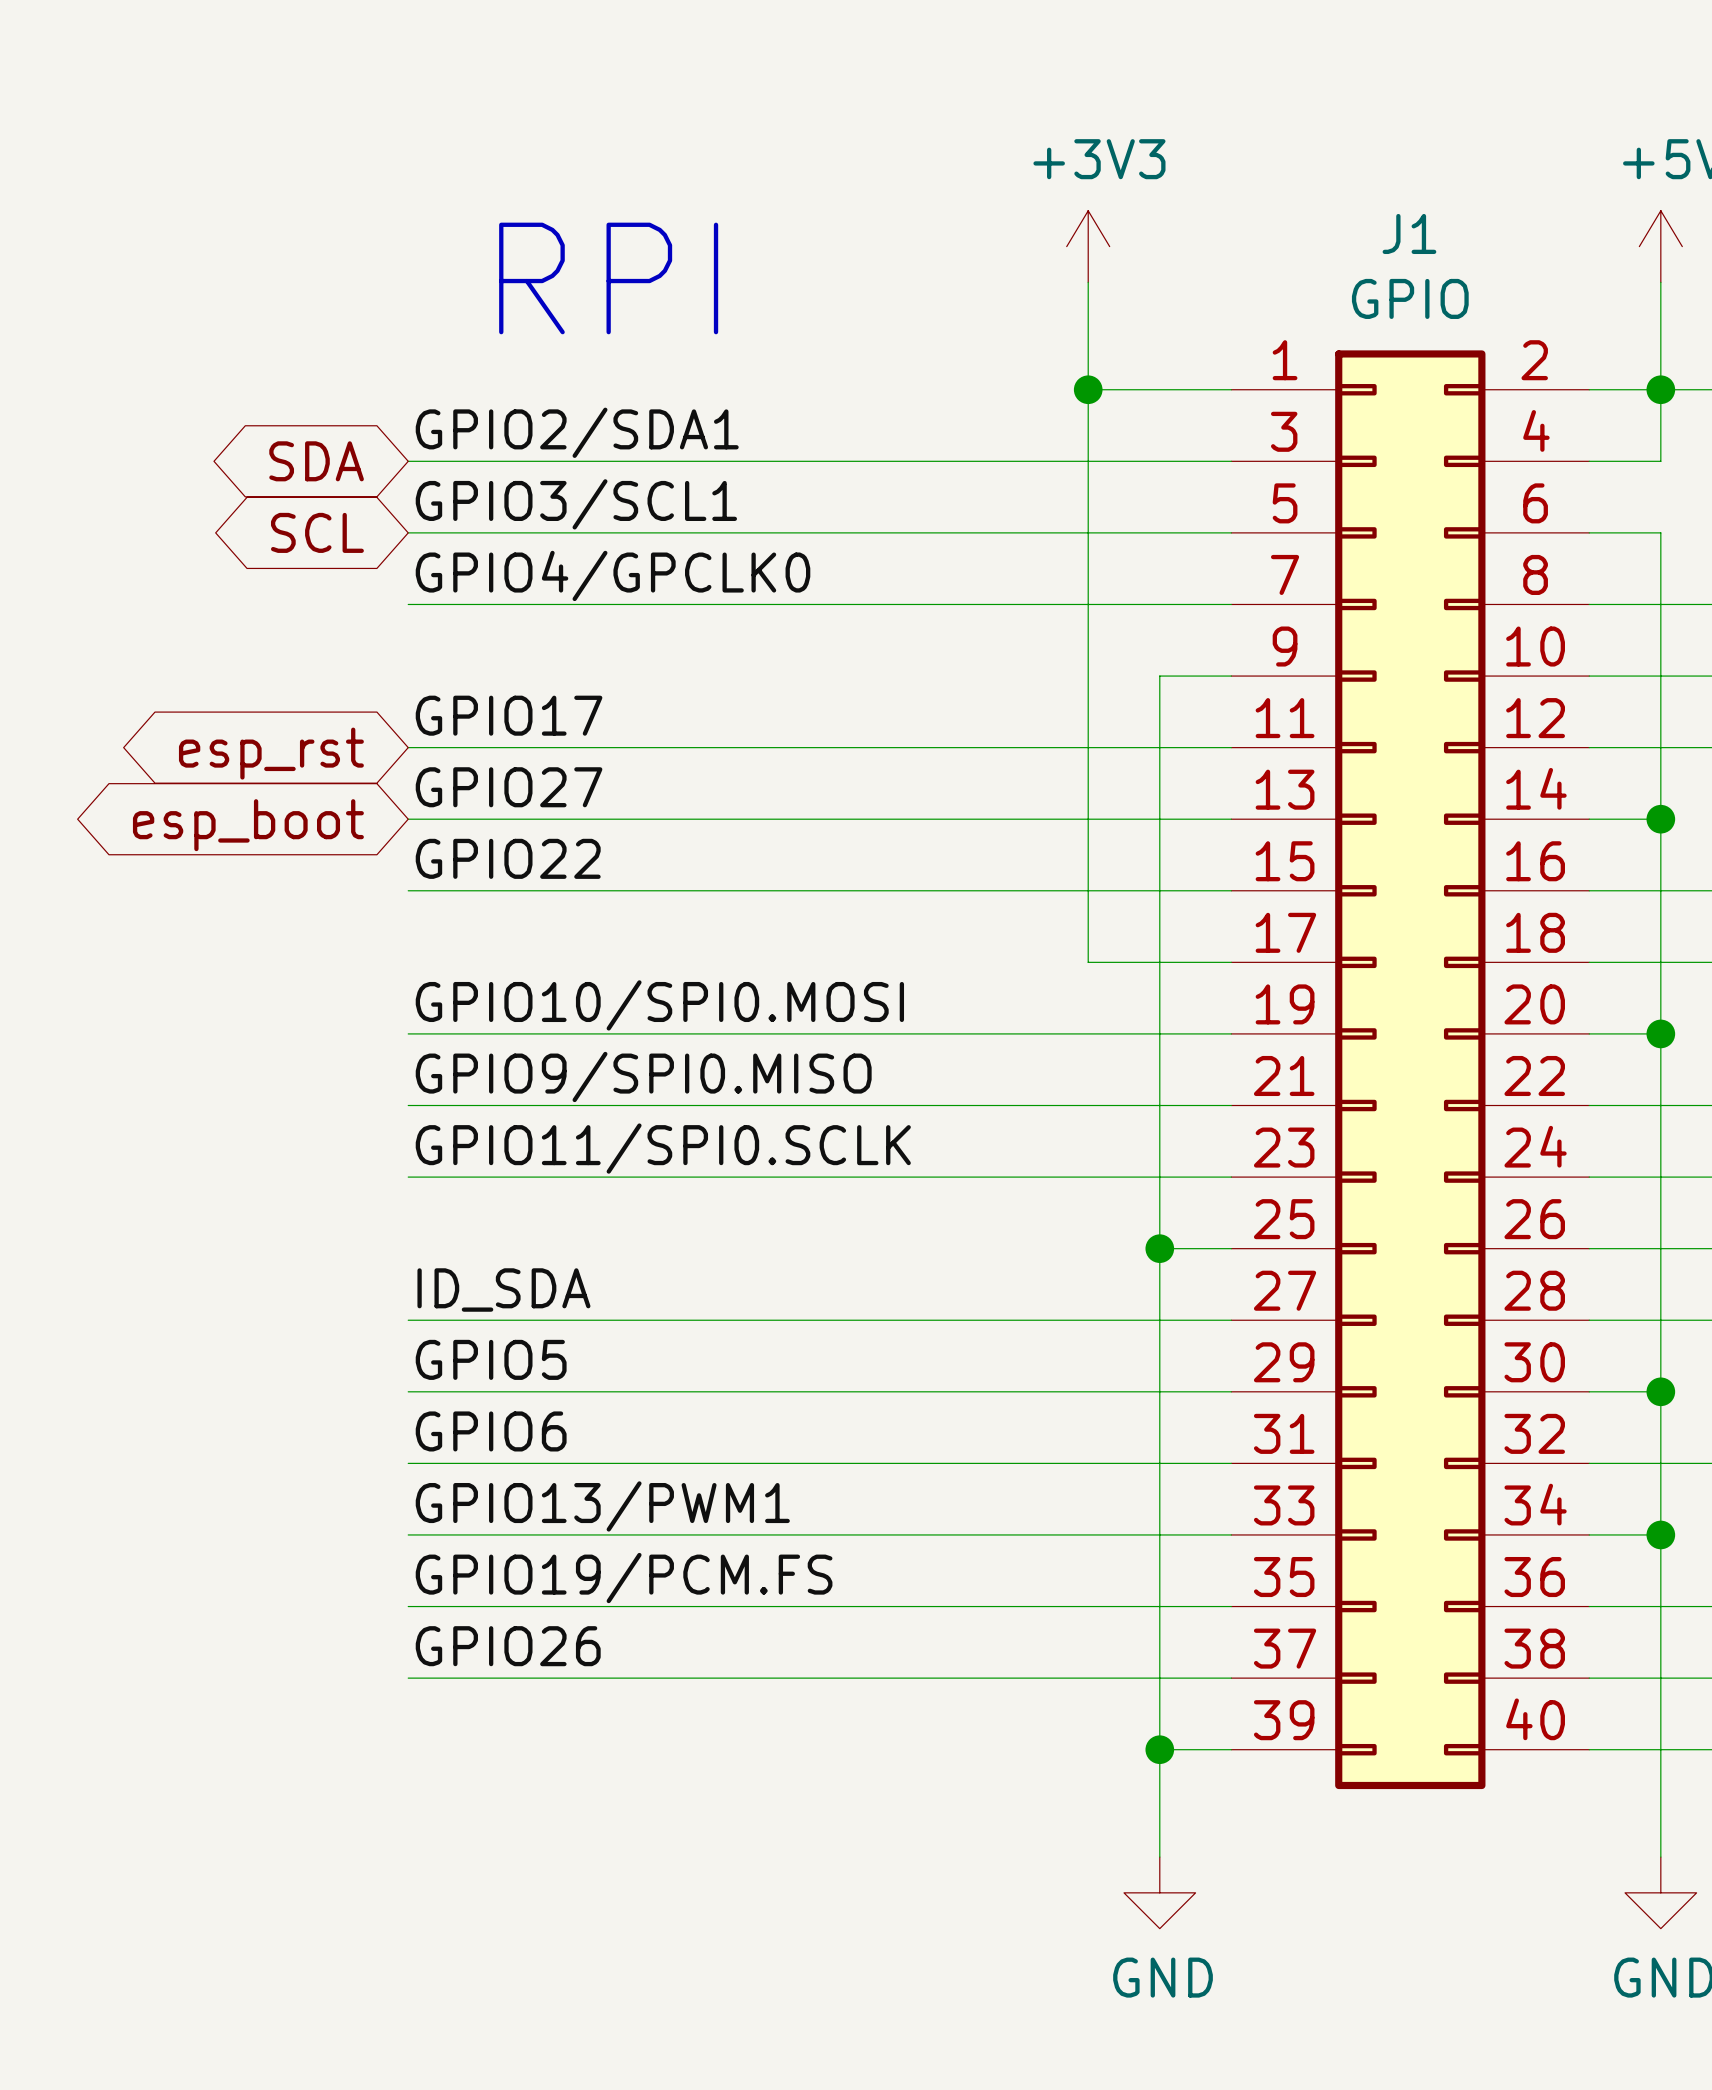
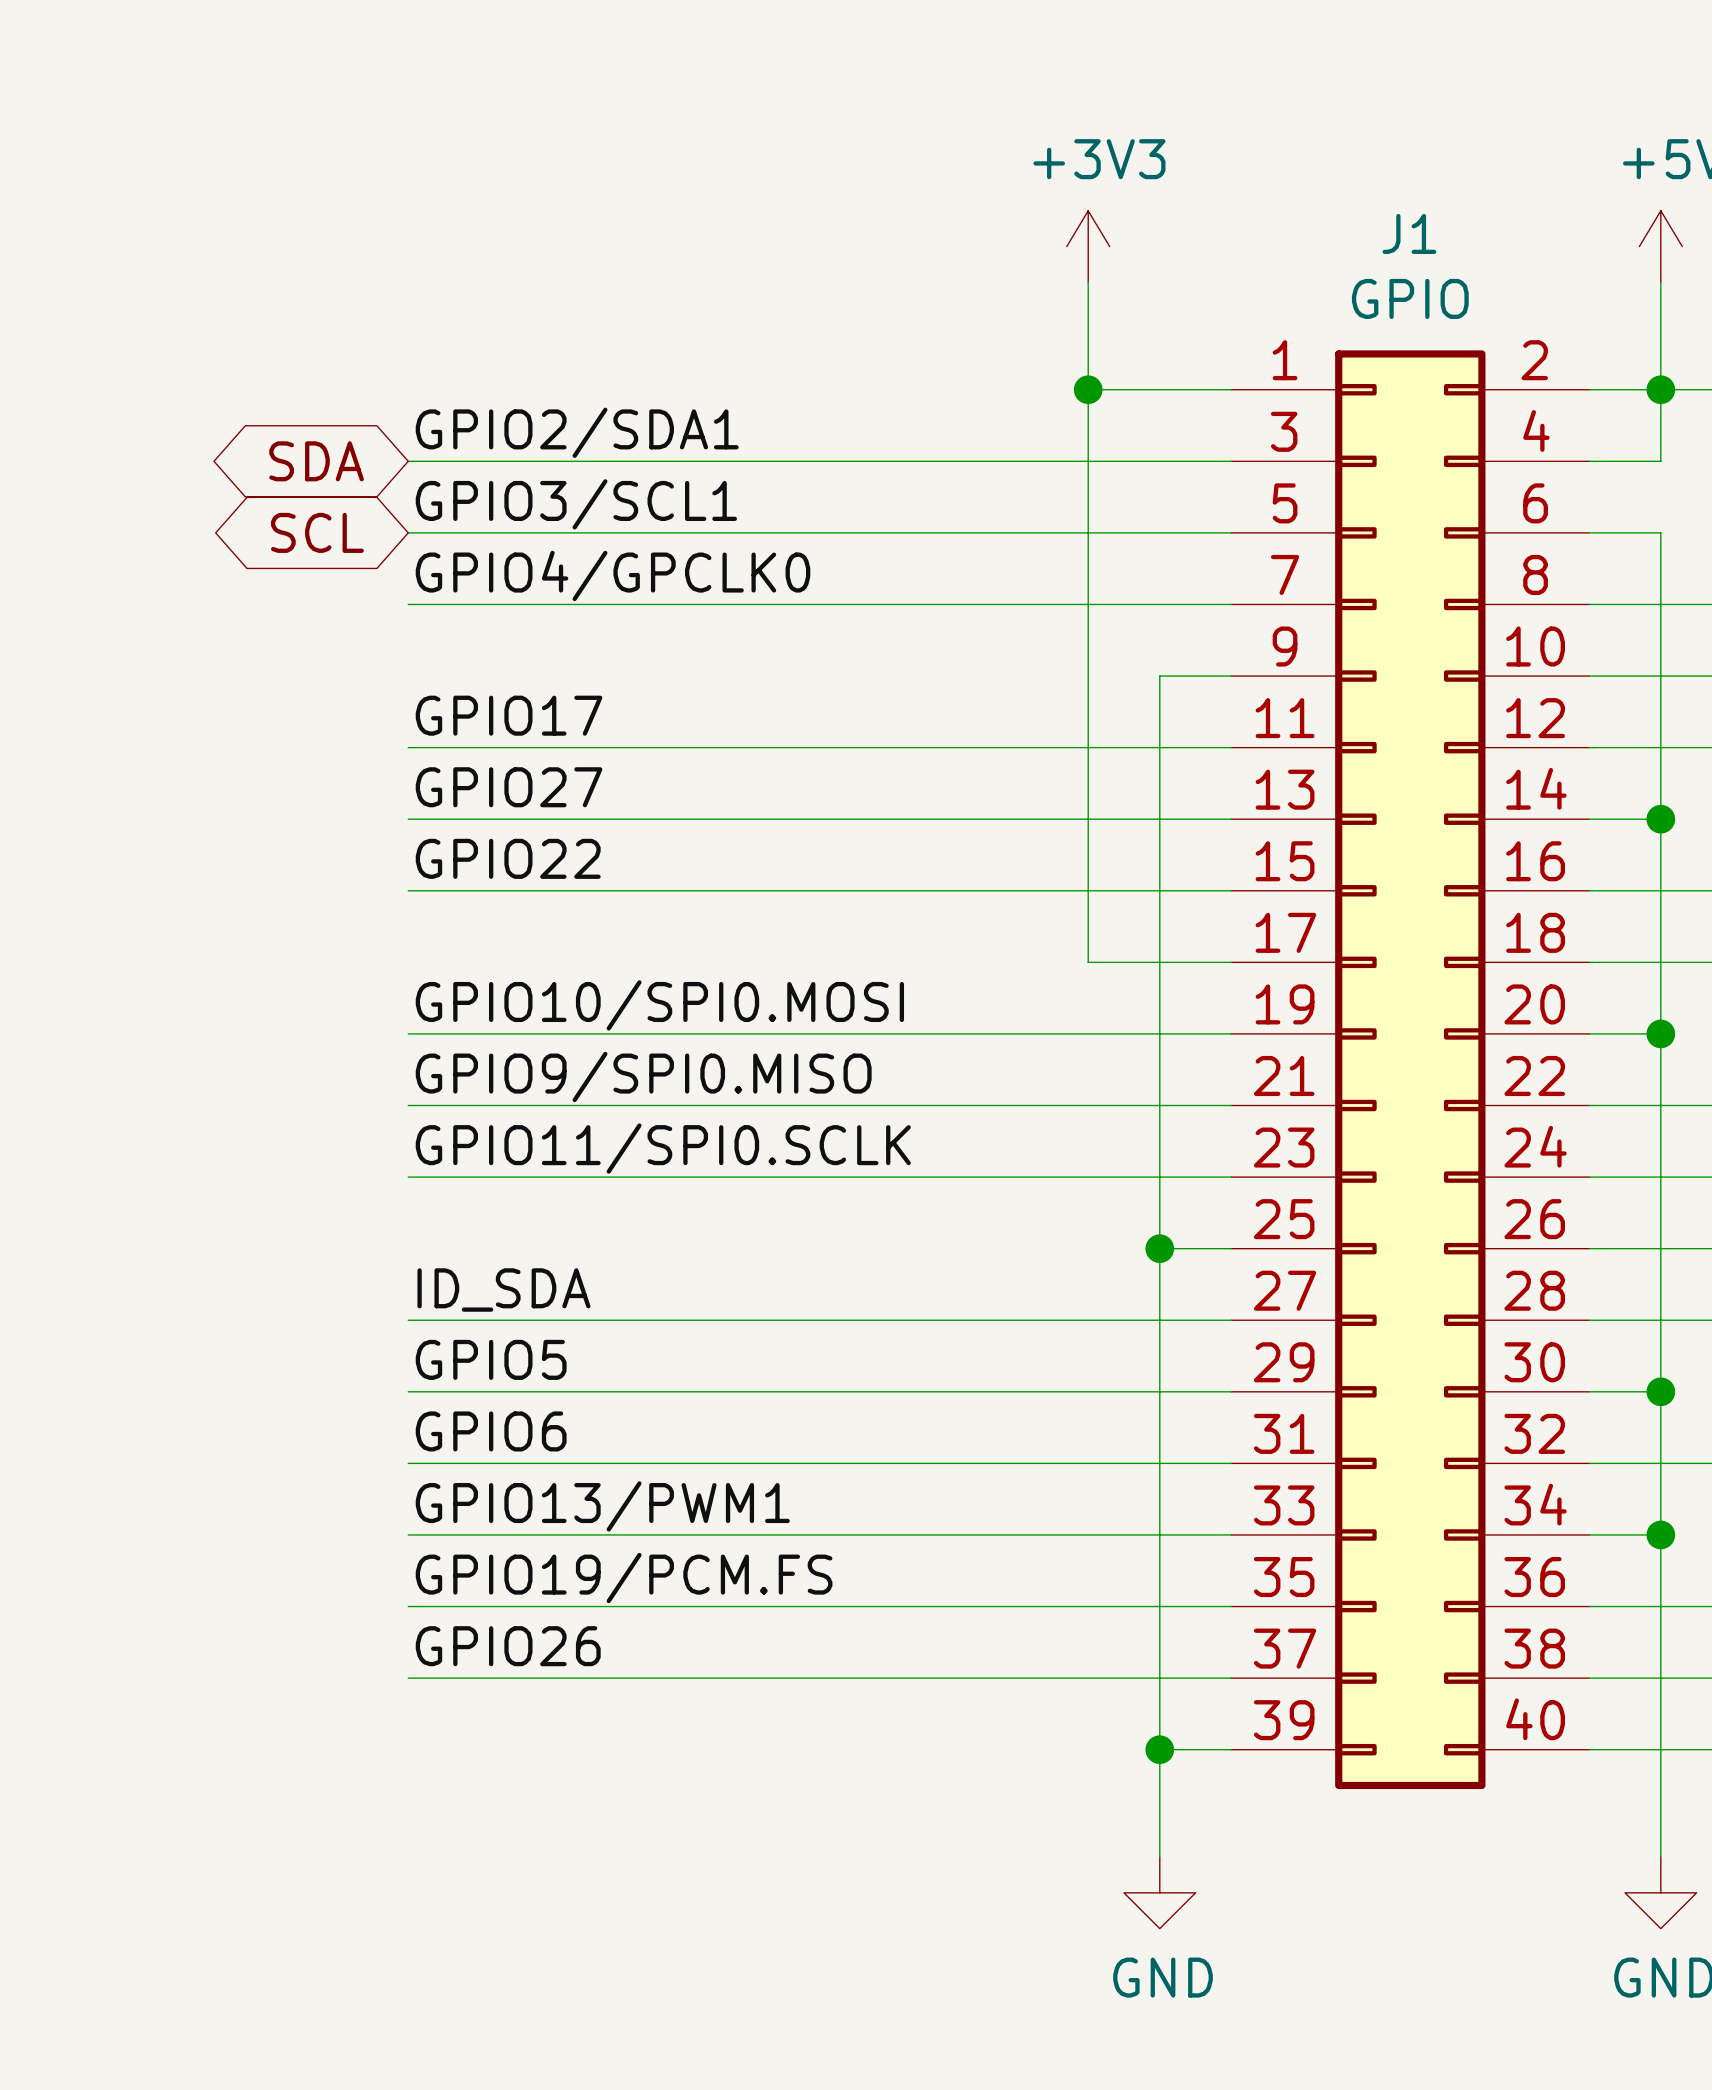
text: RPI (608, 278) -> none
global label: esp_rst (271, 753) -> none
global label: esp_boot (248, 825) -> none

